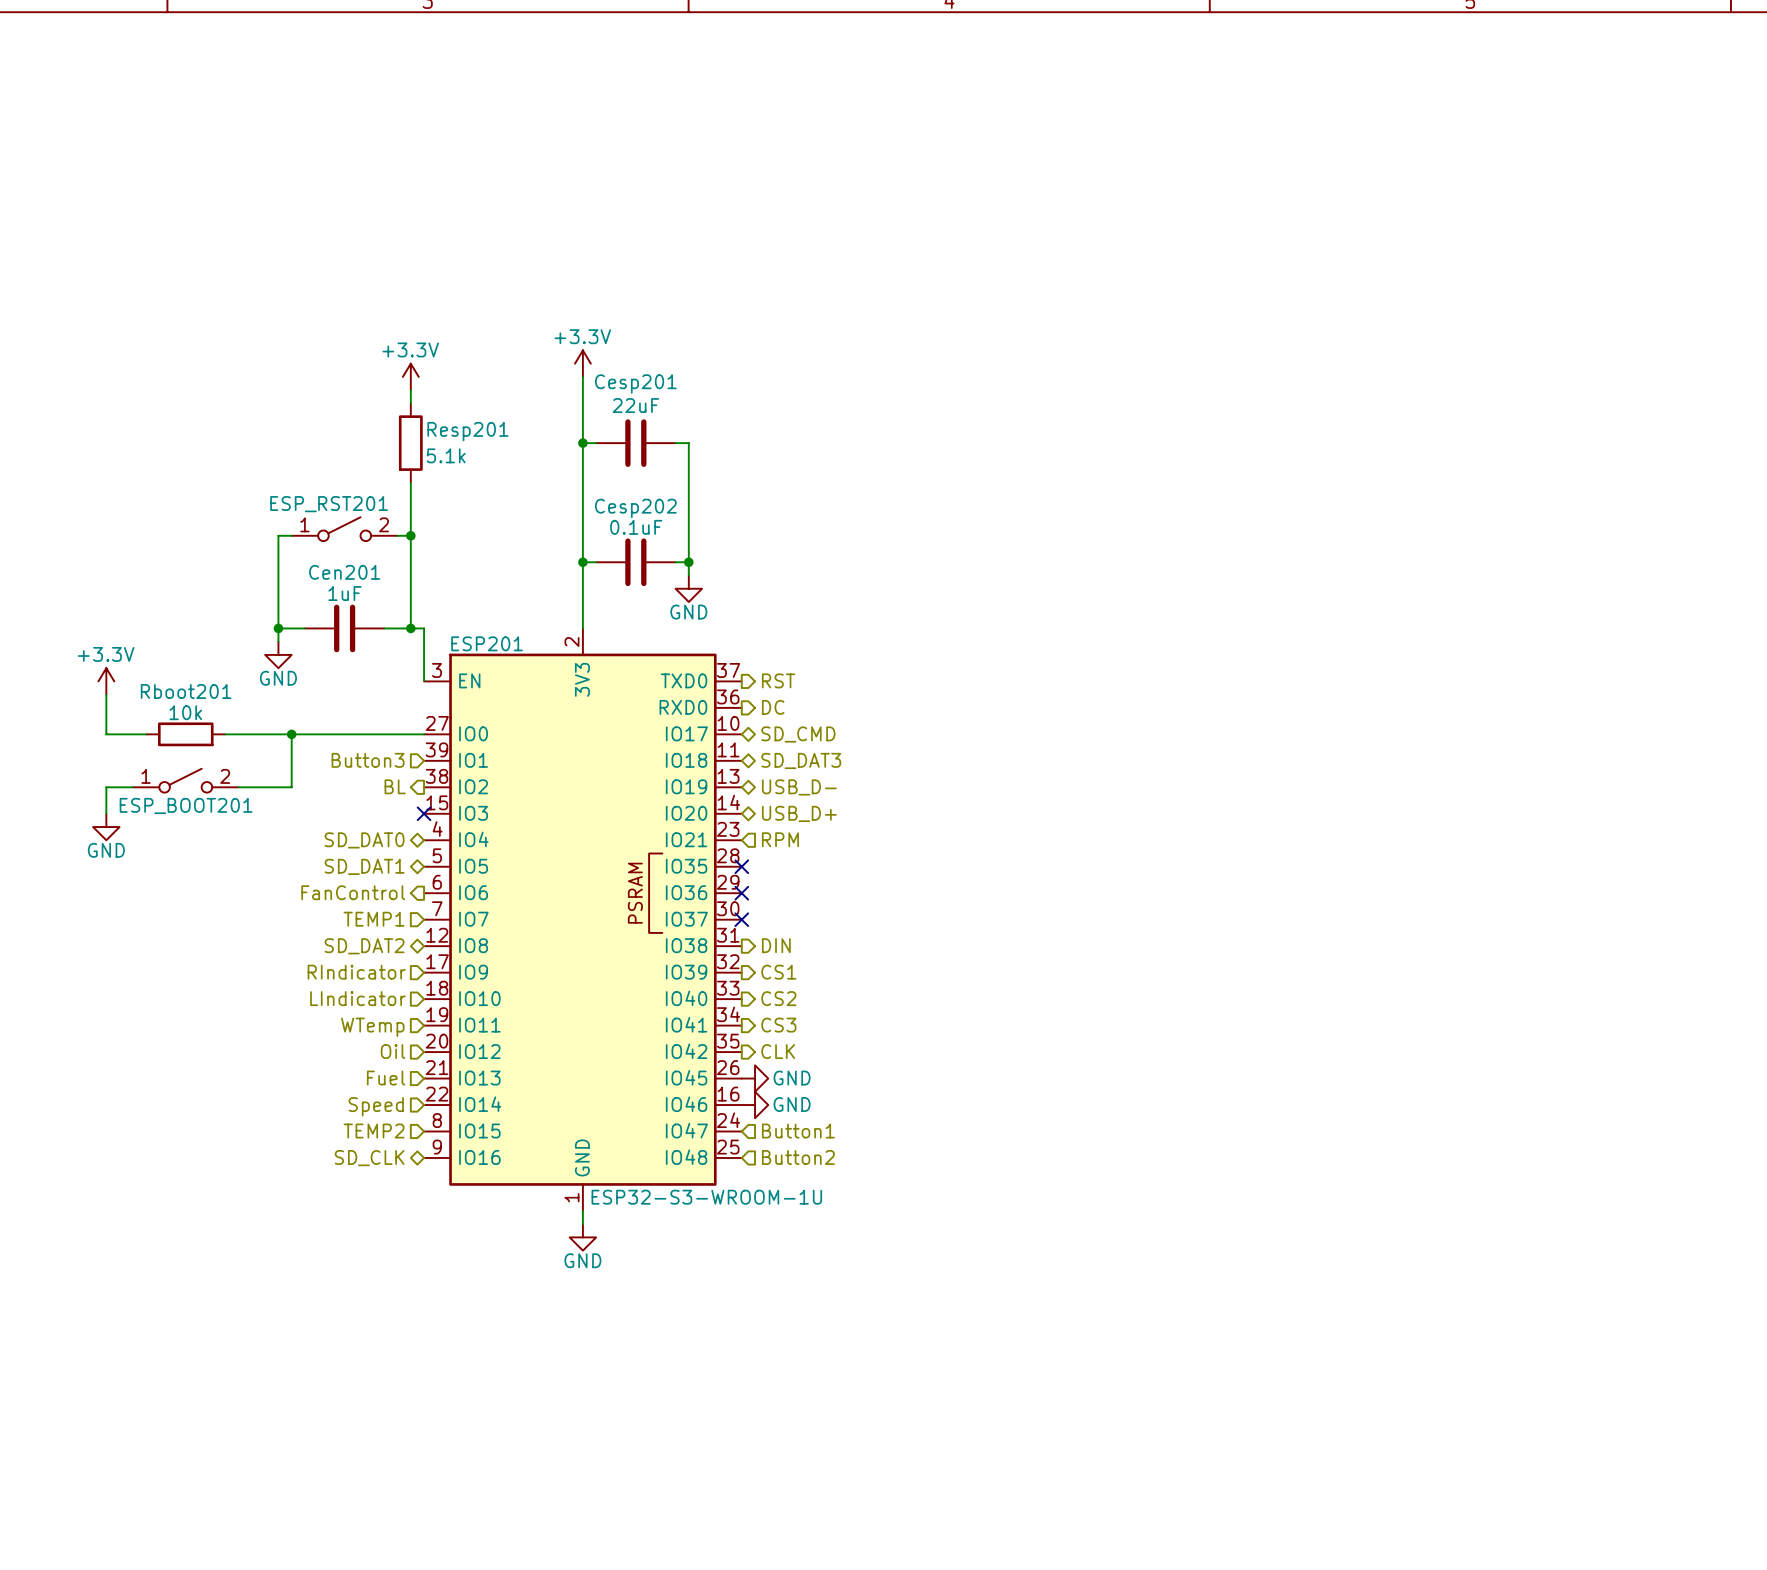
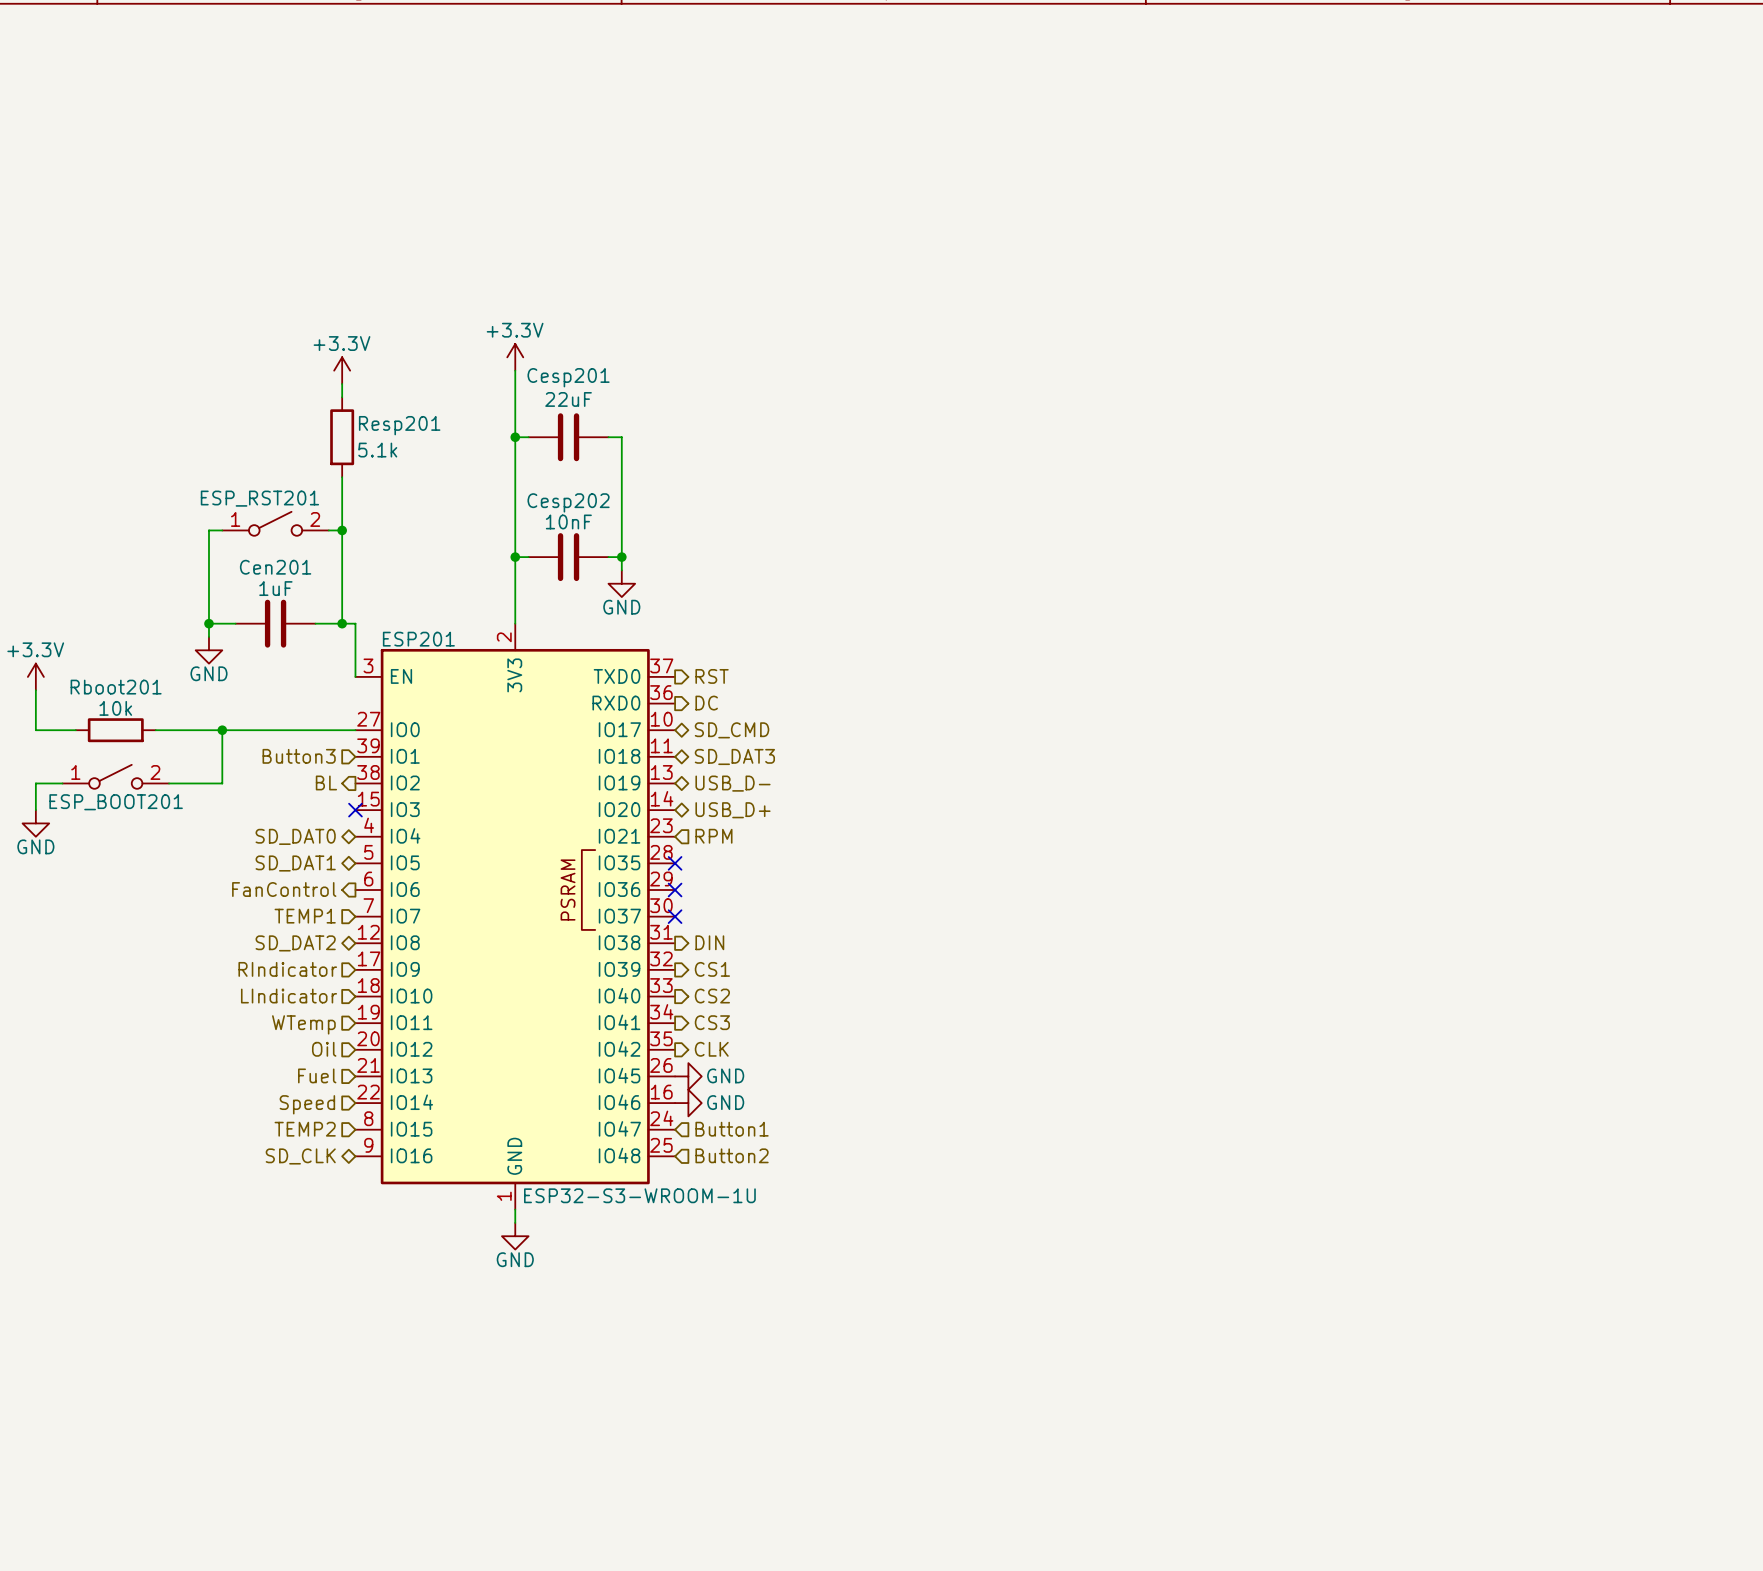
Cesp202 value: 0.1uF (636, 527) -> 10nF (568, 521)

